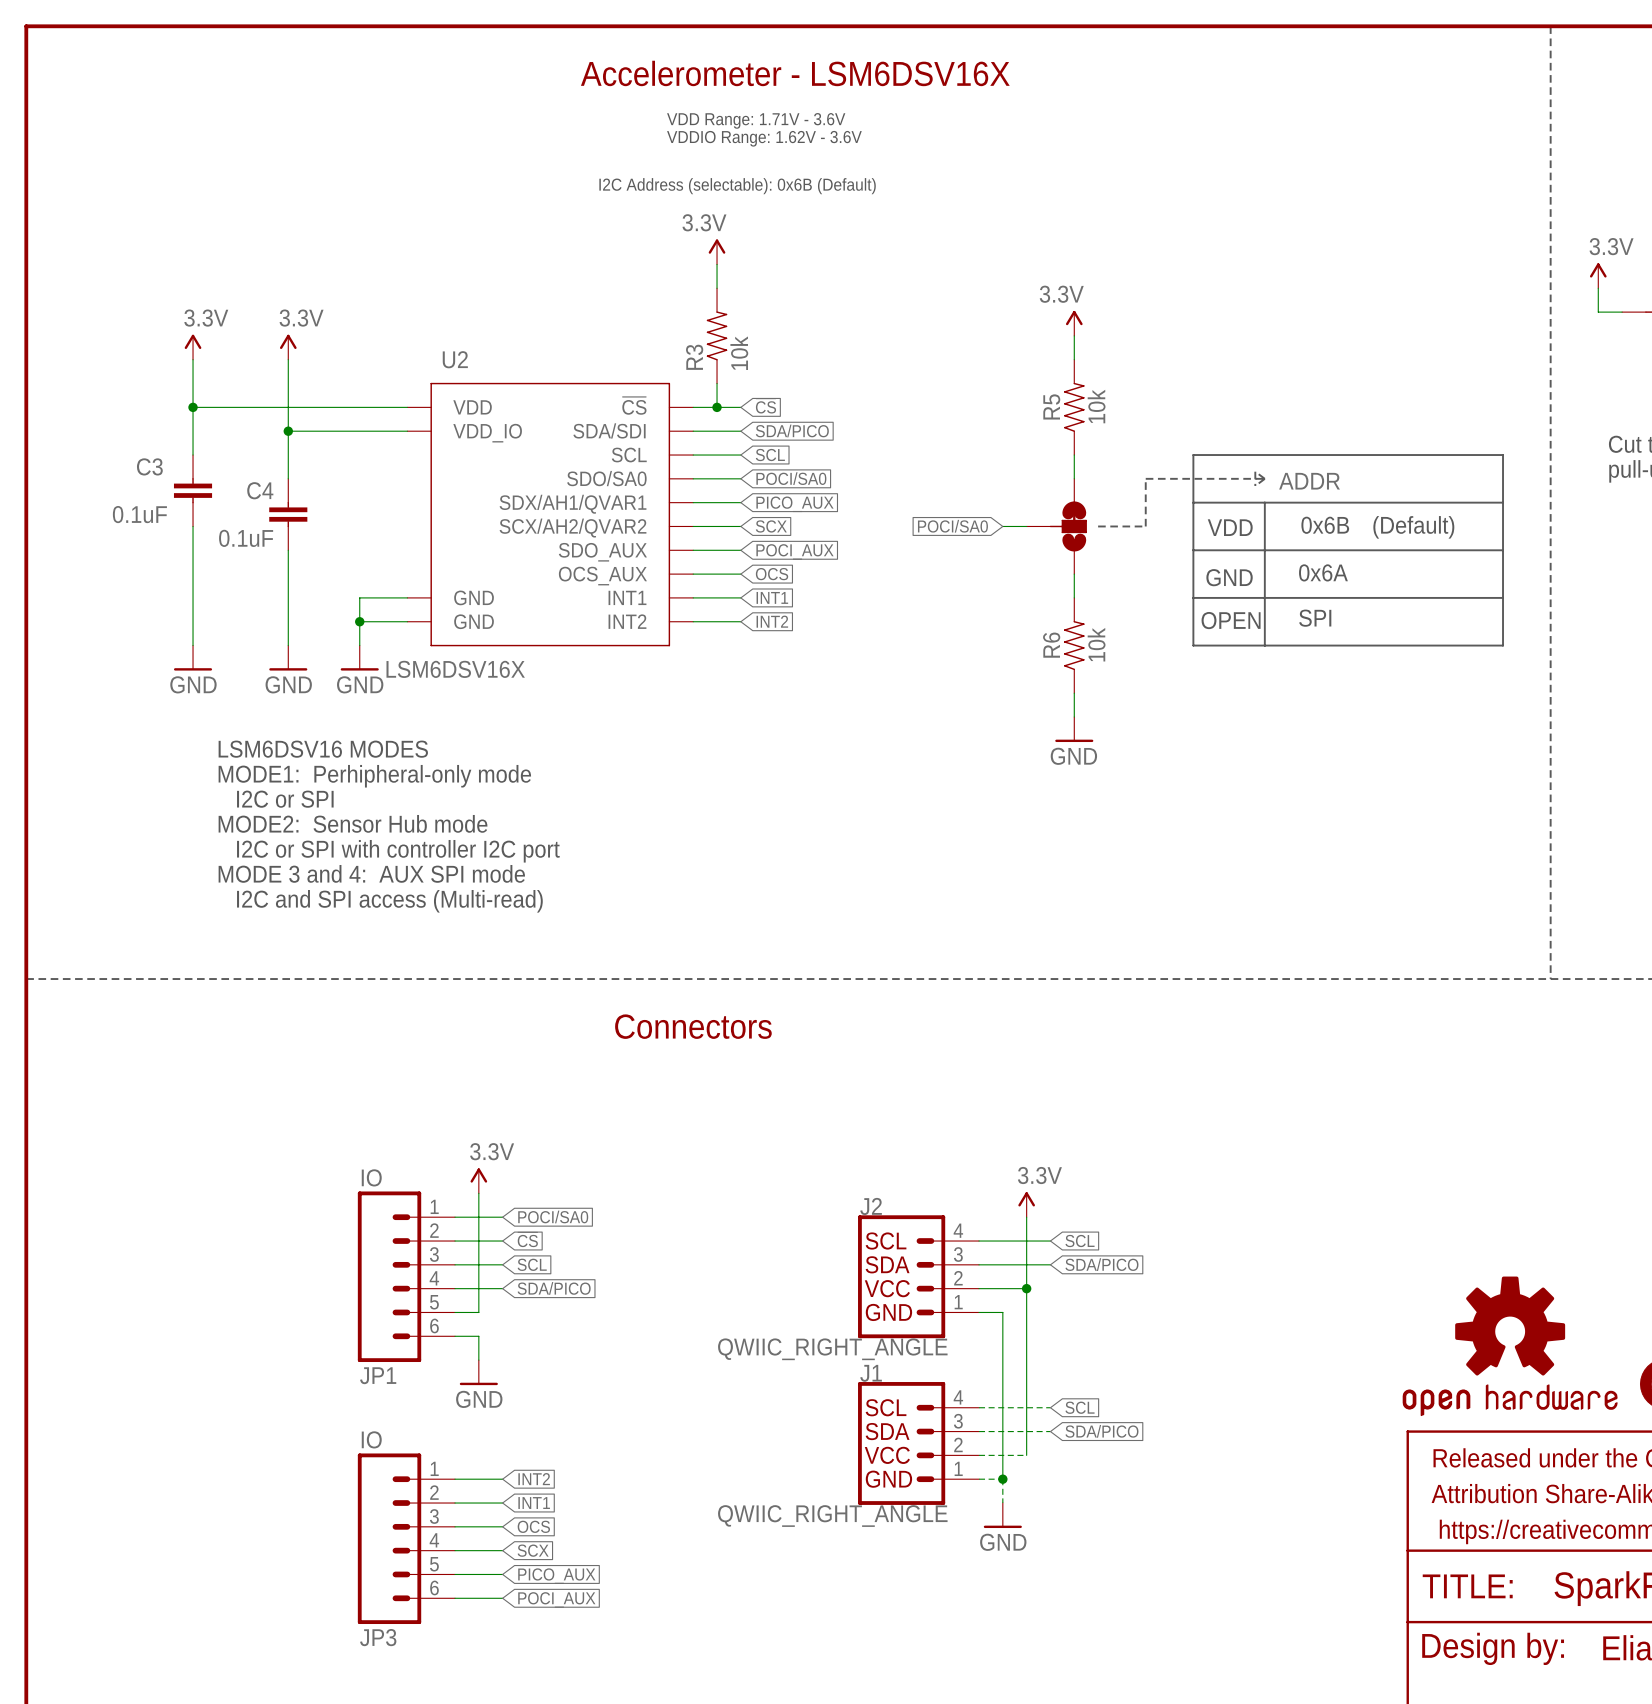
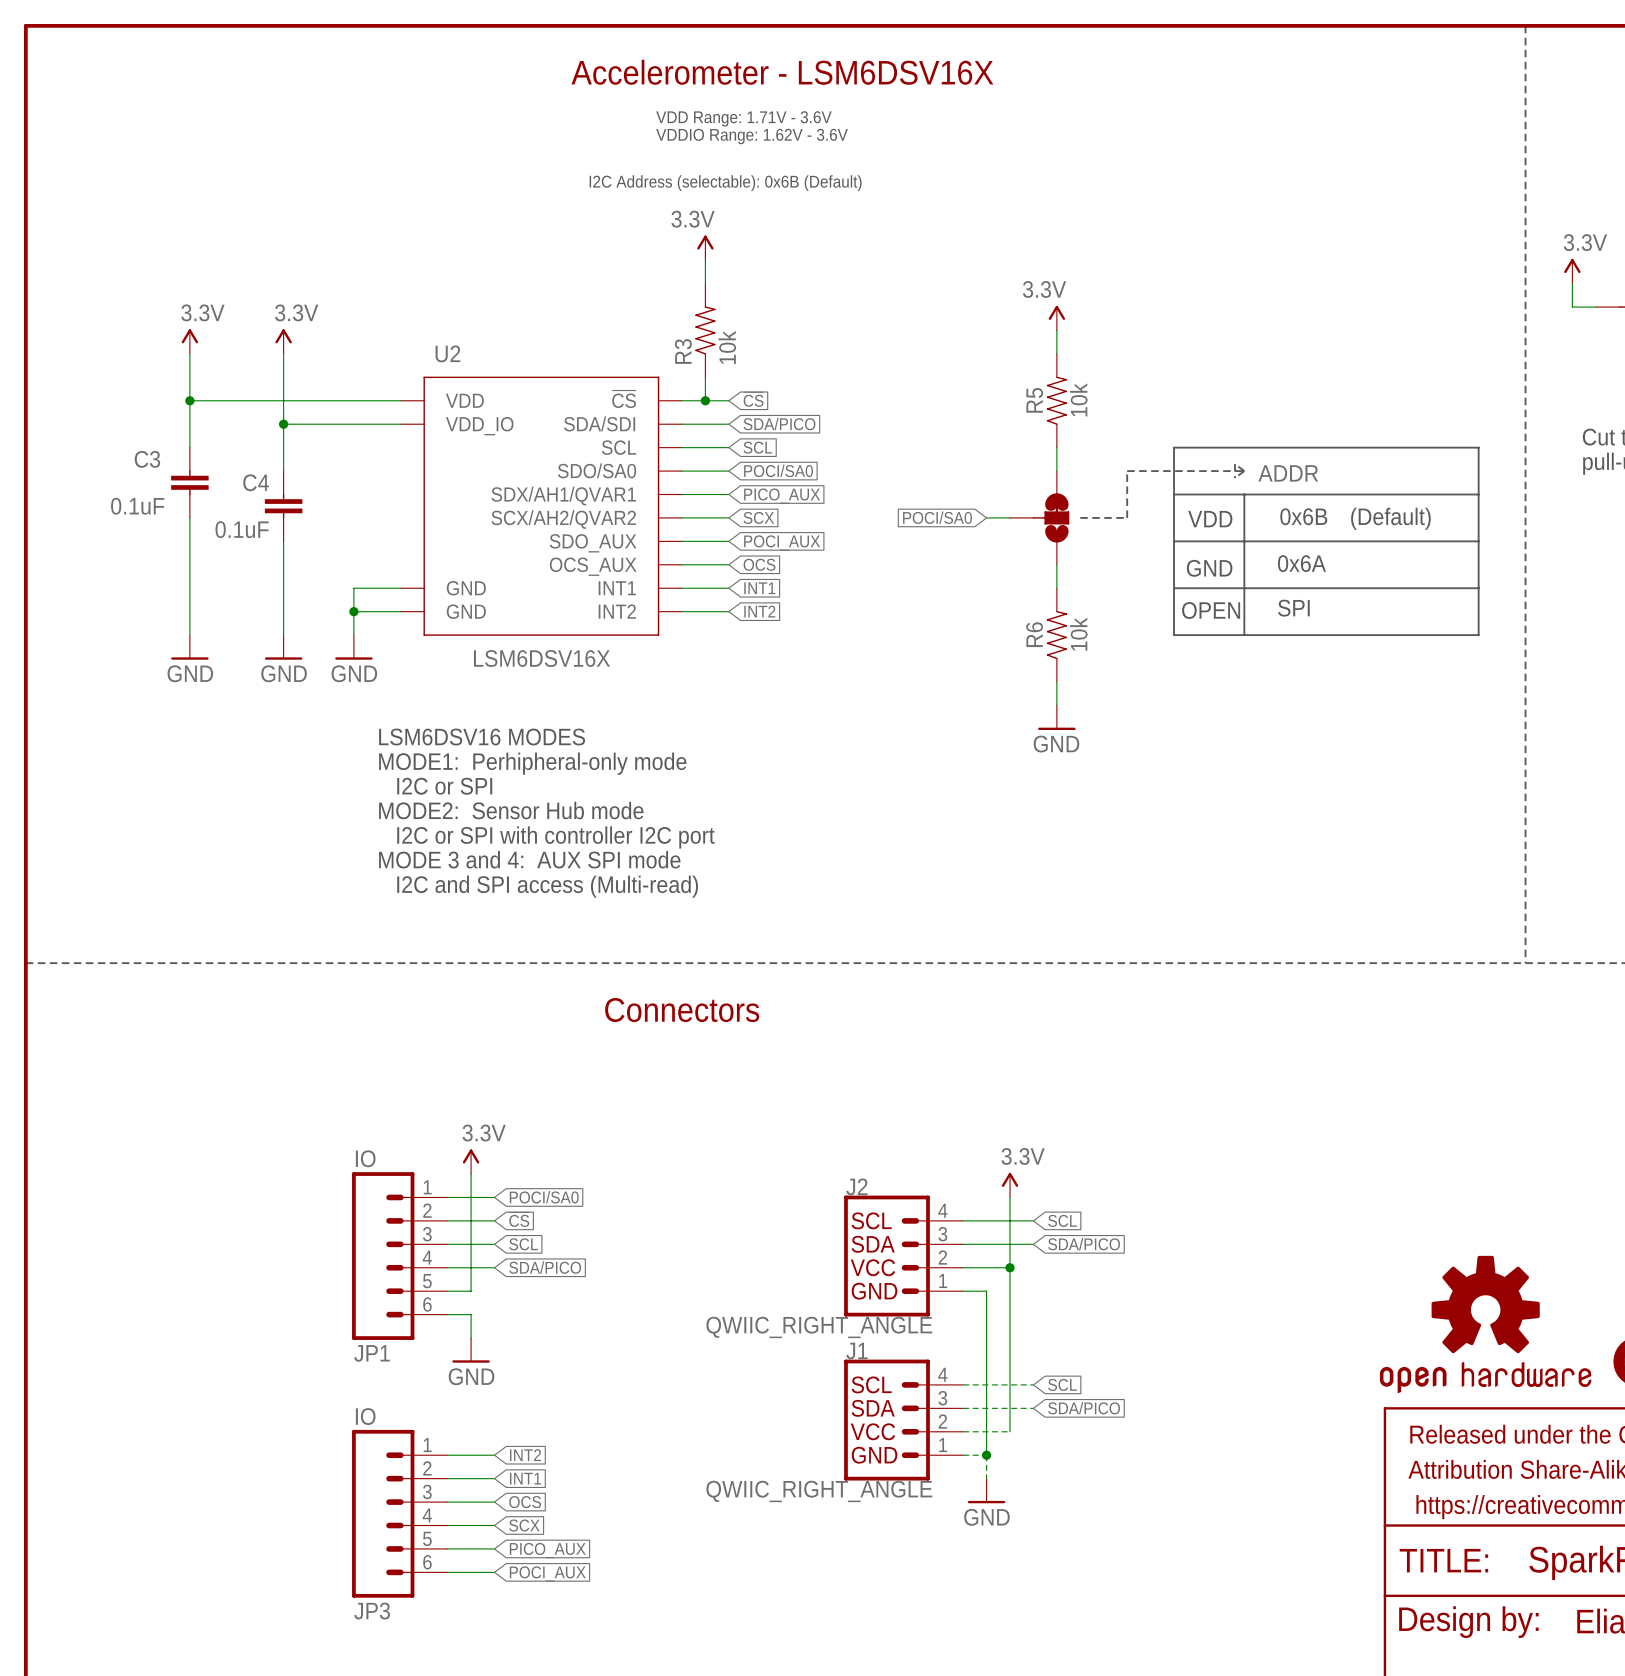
U2 value position: LSM6DSV16X (455, 669) -> LSM6DSV16X (542, 658)
text position: LSM6DSV16 MODES (323, 749) -> LSM6DSV16 MODES (482, 737)
text position: MODE1: Perhipheral-only mode (374, 776) -> MODE1: Perhipheral-only mode (532, 763)
text position: I2C or SPI (285, 799) -> I2C or SPI (444, 786)
text position: MODE2: Sensor Hub mode (353, 823) -> MODE2: Sensor Hub mode (511, 810)
text position: I2C or SPI with controller I2C port (398, 851) -> I2C or SPI with controller I2C port (555, 837)
text position: MODE 3 and 4: AUX SPI mode (371, 873) -> MODE 3 and 4: AUX SPI mode (529, 859)
text position: I2C and SPI access (Multi-read) (389, 901) -> I2C and SPI access (Multi-read) (547, 886)

